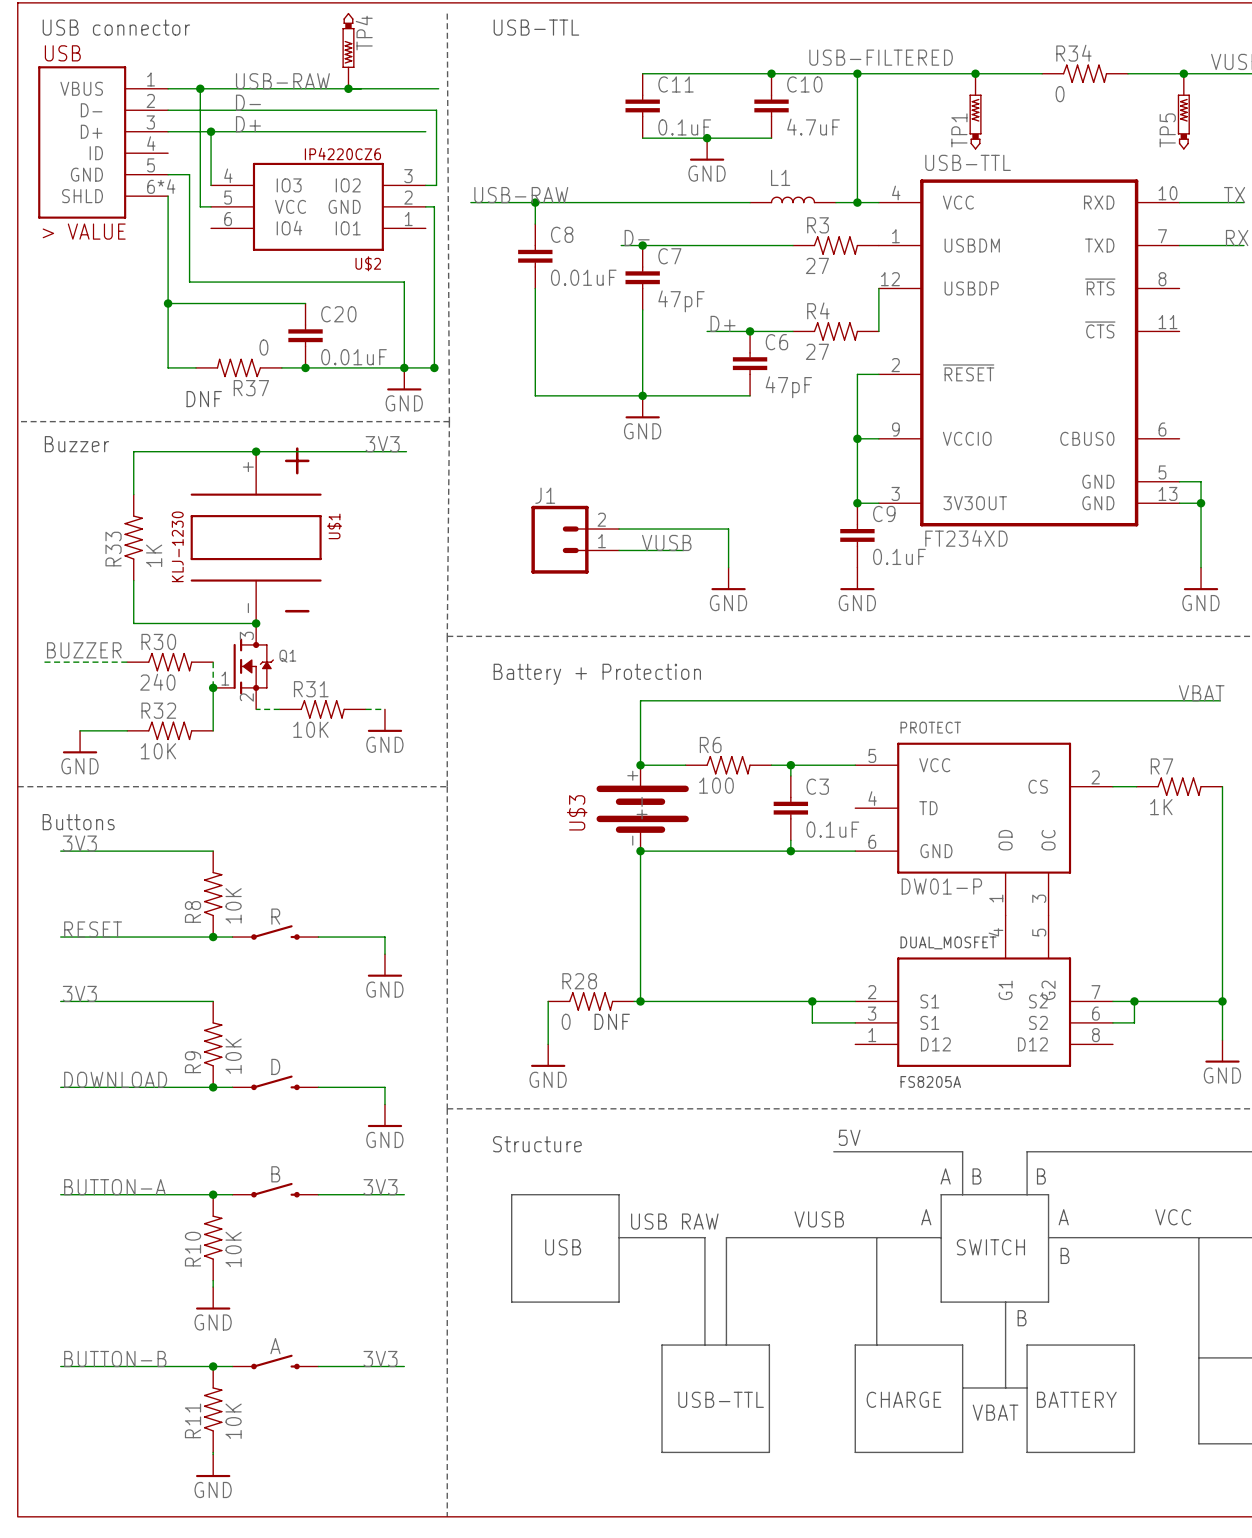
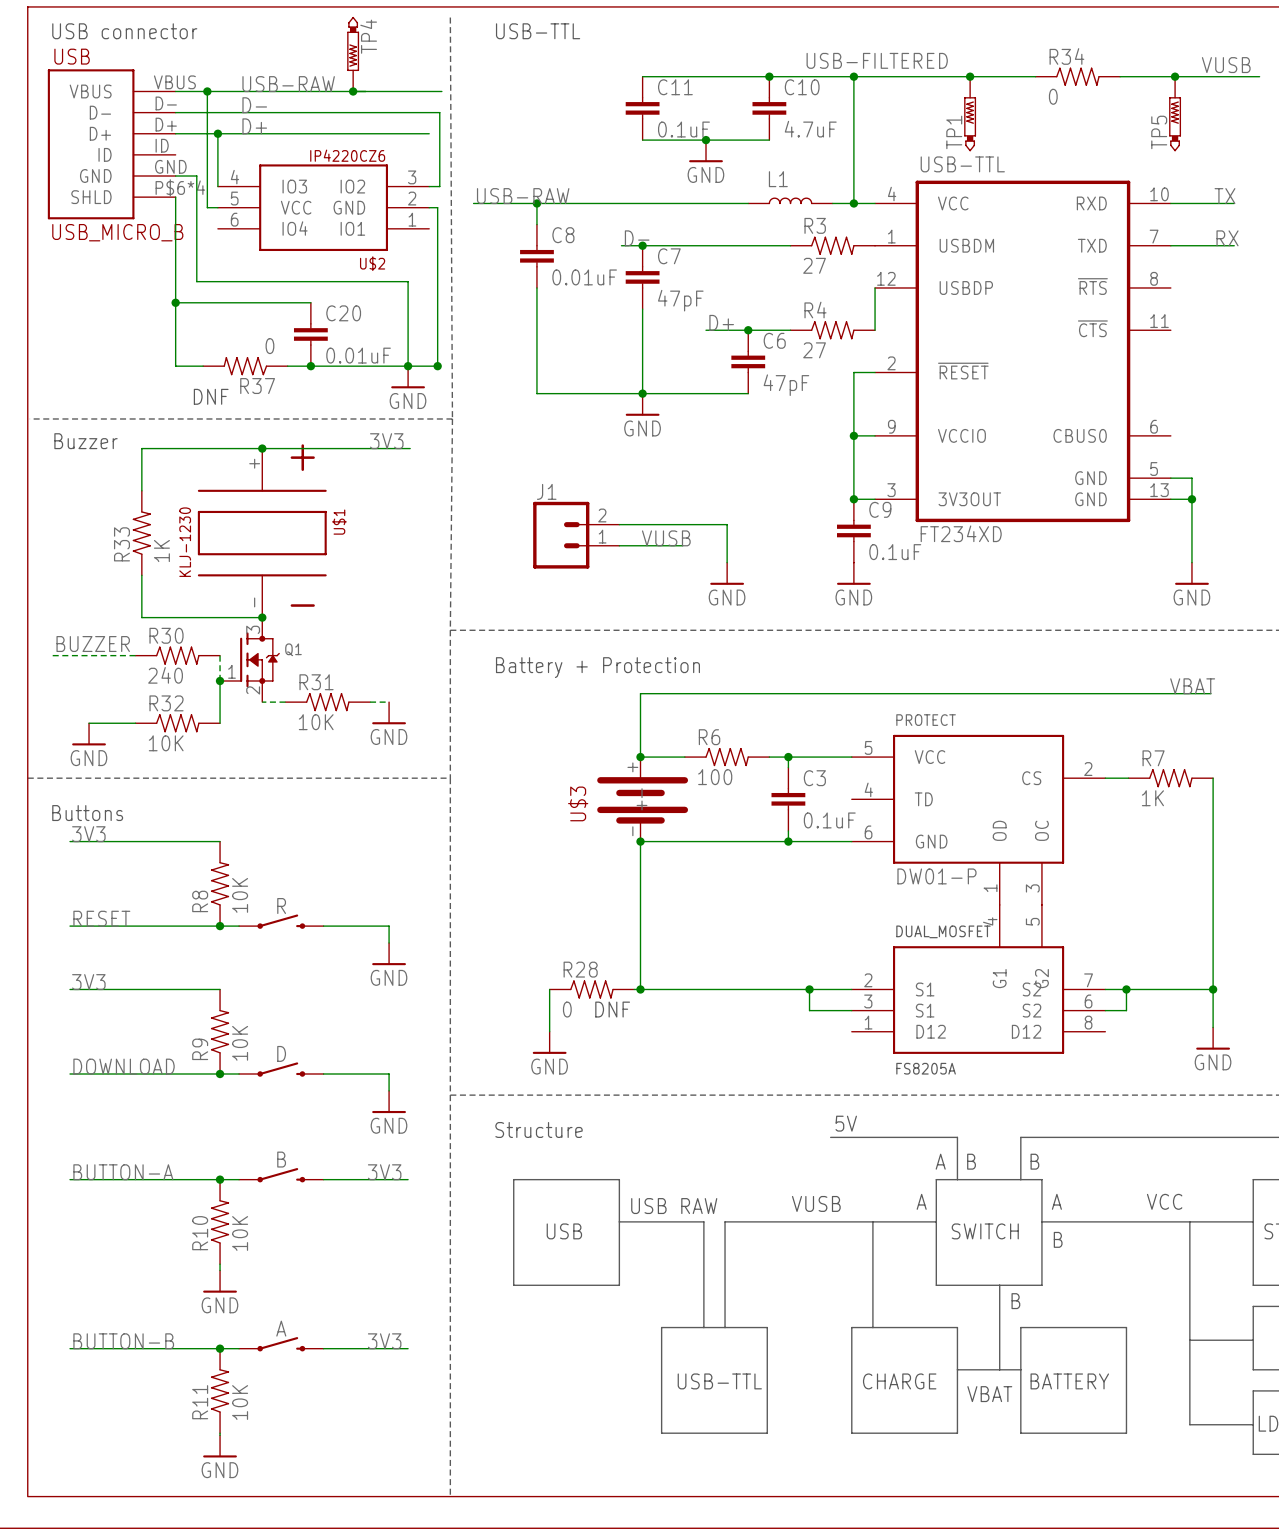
USB pin number: 1 (151, 79) -> VBUS (174, 82)
USB pin number: 2 (150, 100) -> D- (166, 103)
USB pin number: 3 (150, 122) -> D+ (166, 124)
USB pin number: 4 (151, 143) -> ID (162, 145)
USB pin number: 5 (151, 165) -> GND (170, 166)
USB pin number: 6*4 (161, 186) -> P$6*4 (180, 187)
USB text: > VALUE (84, 231) -> none
USB value: none -> USB_MICRO_B (117, 232)

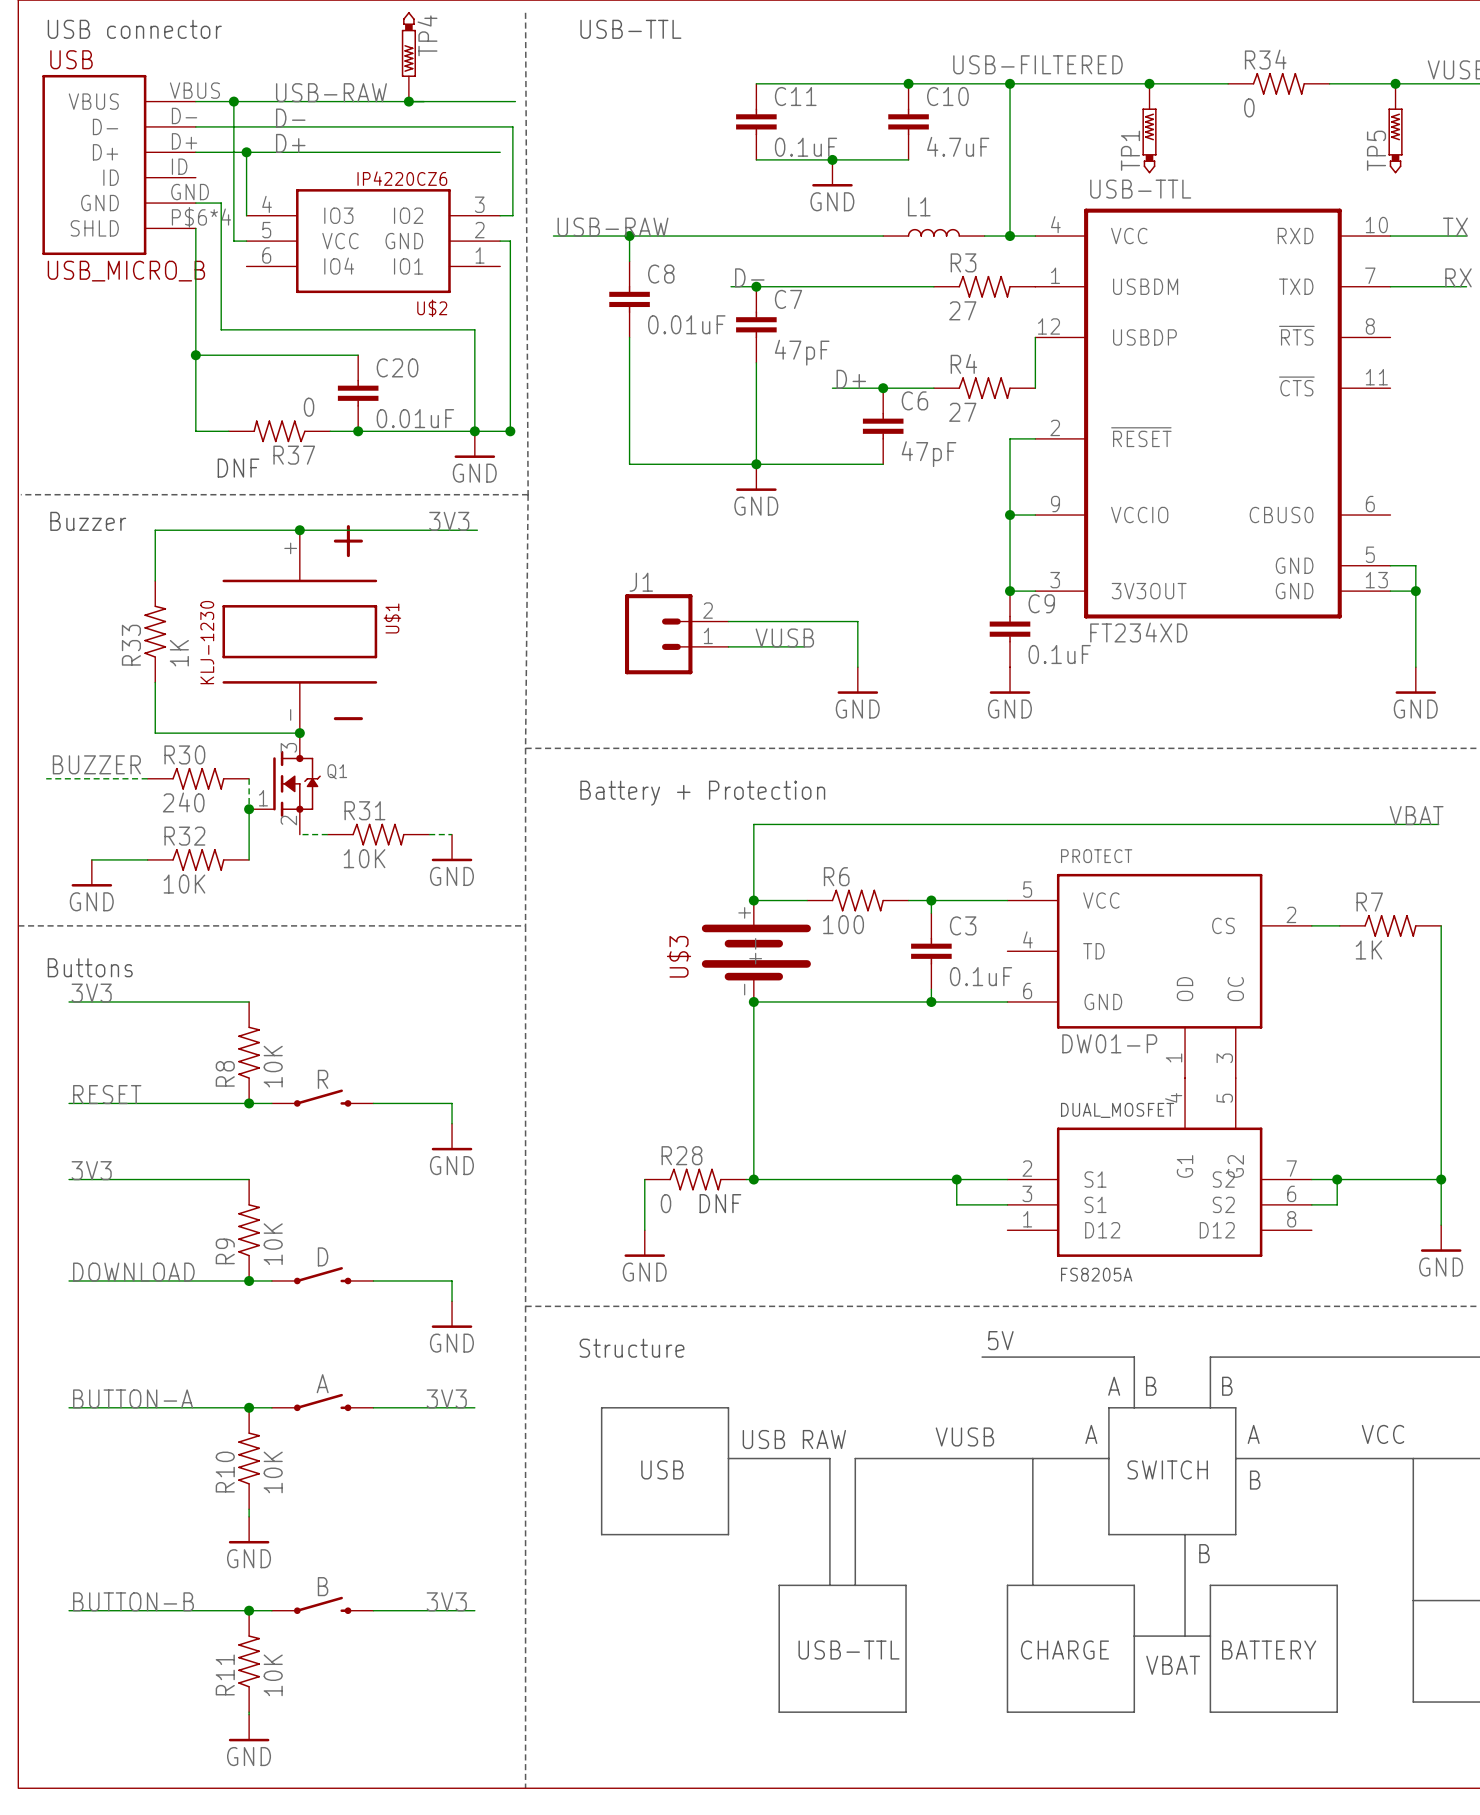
B name: B (281, 1159) -> A (322, 1383)
A name: A (281, 1328) -> B (323, 1586)

